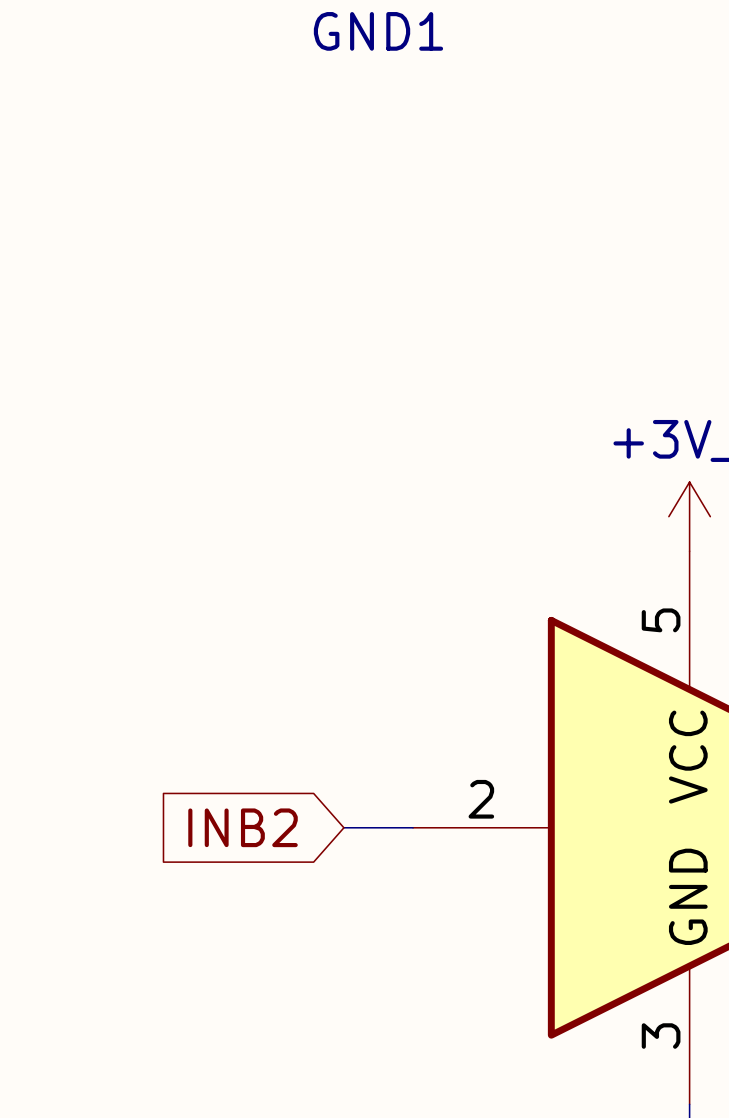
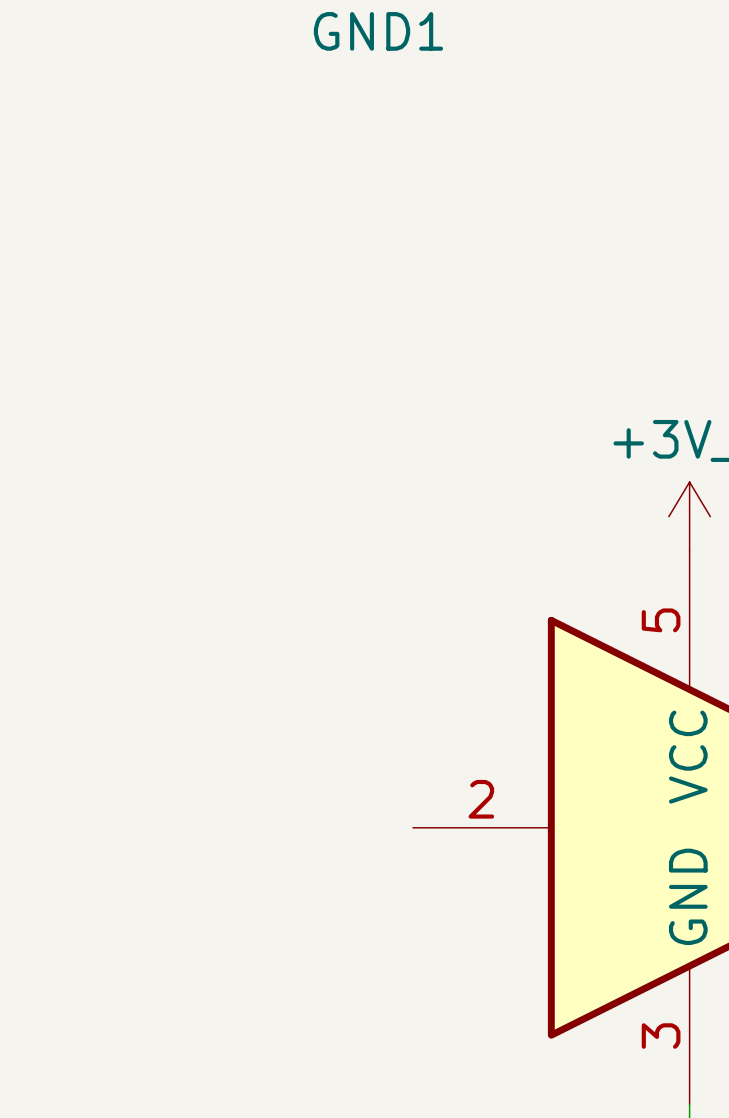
global label: INB2 (243, 827) -> none
wire: (343, 827) (413, 827) -> none

